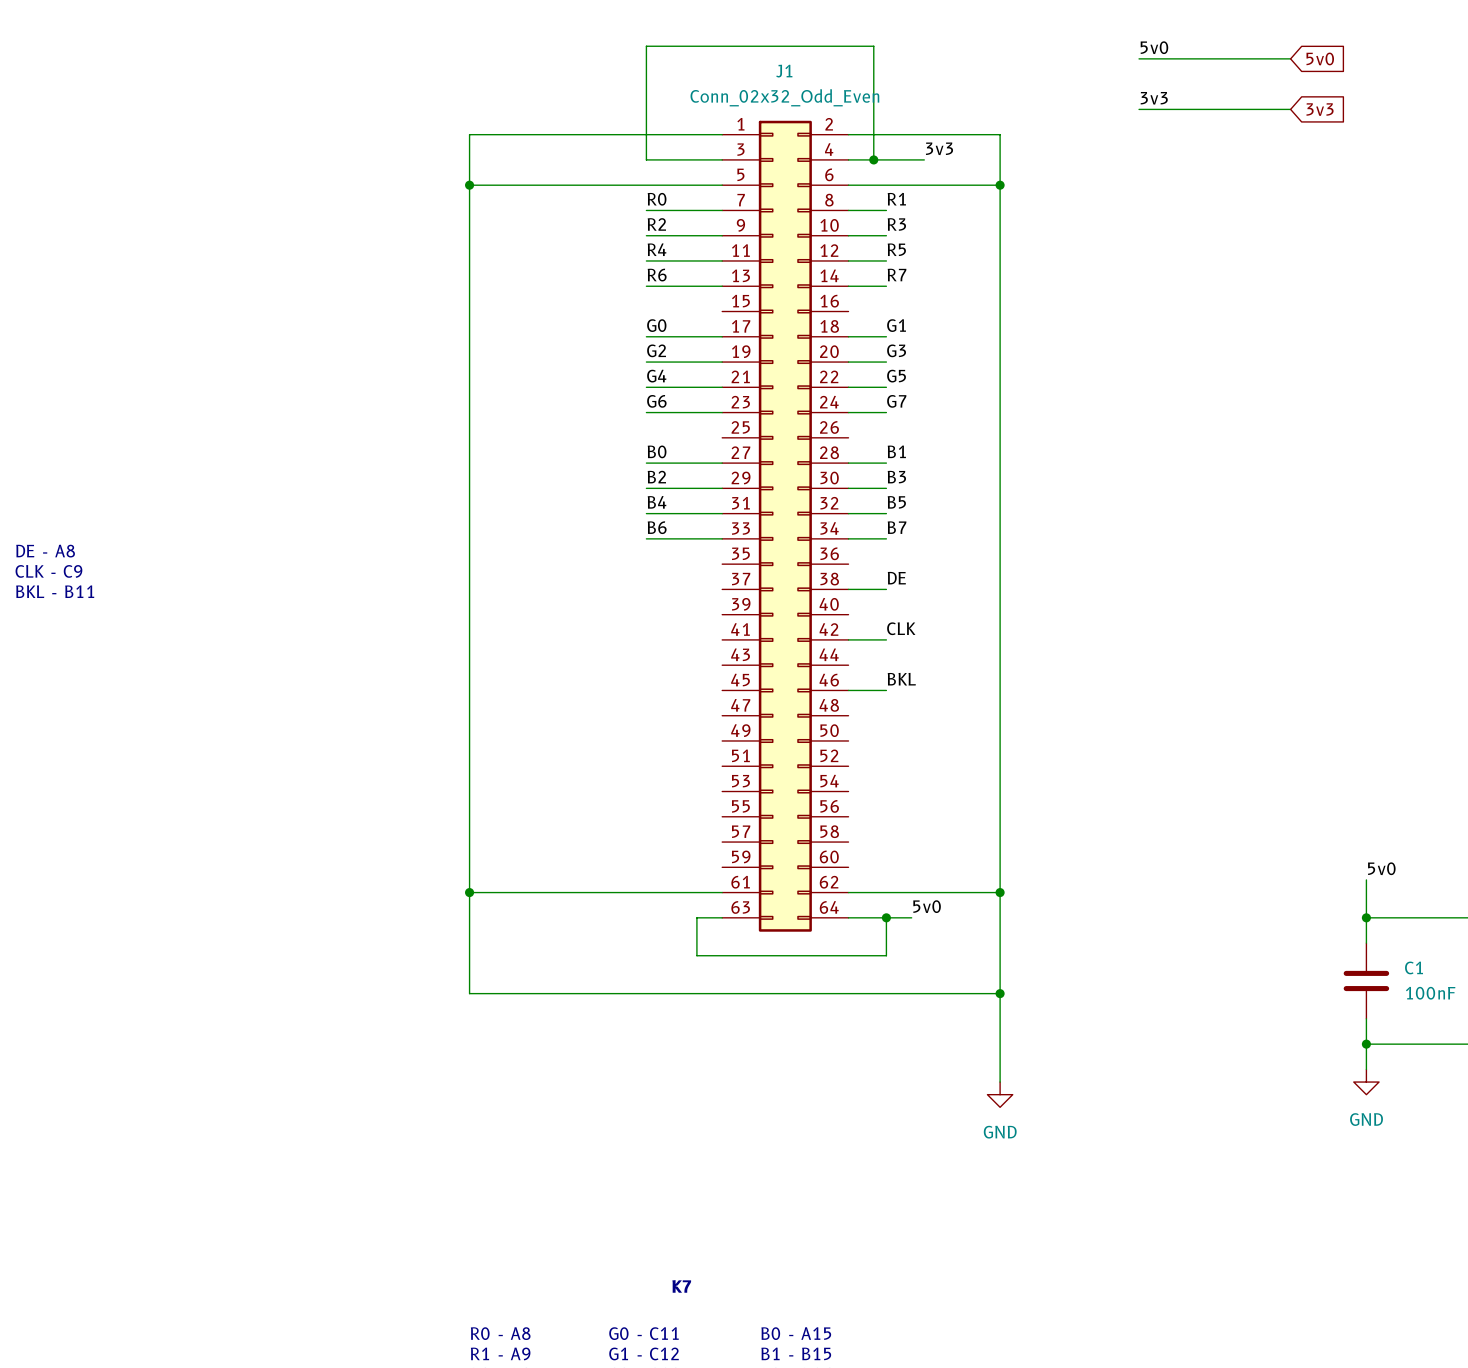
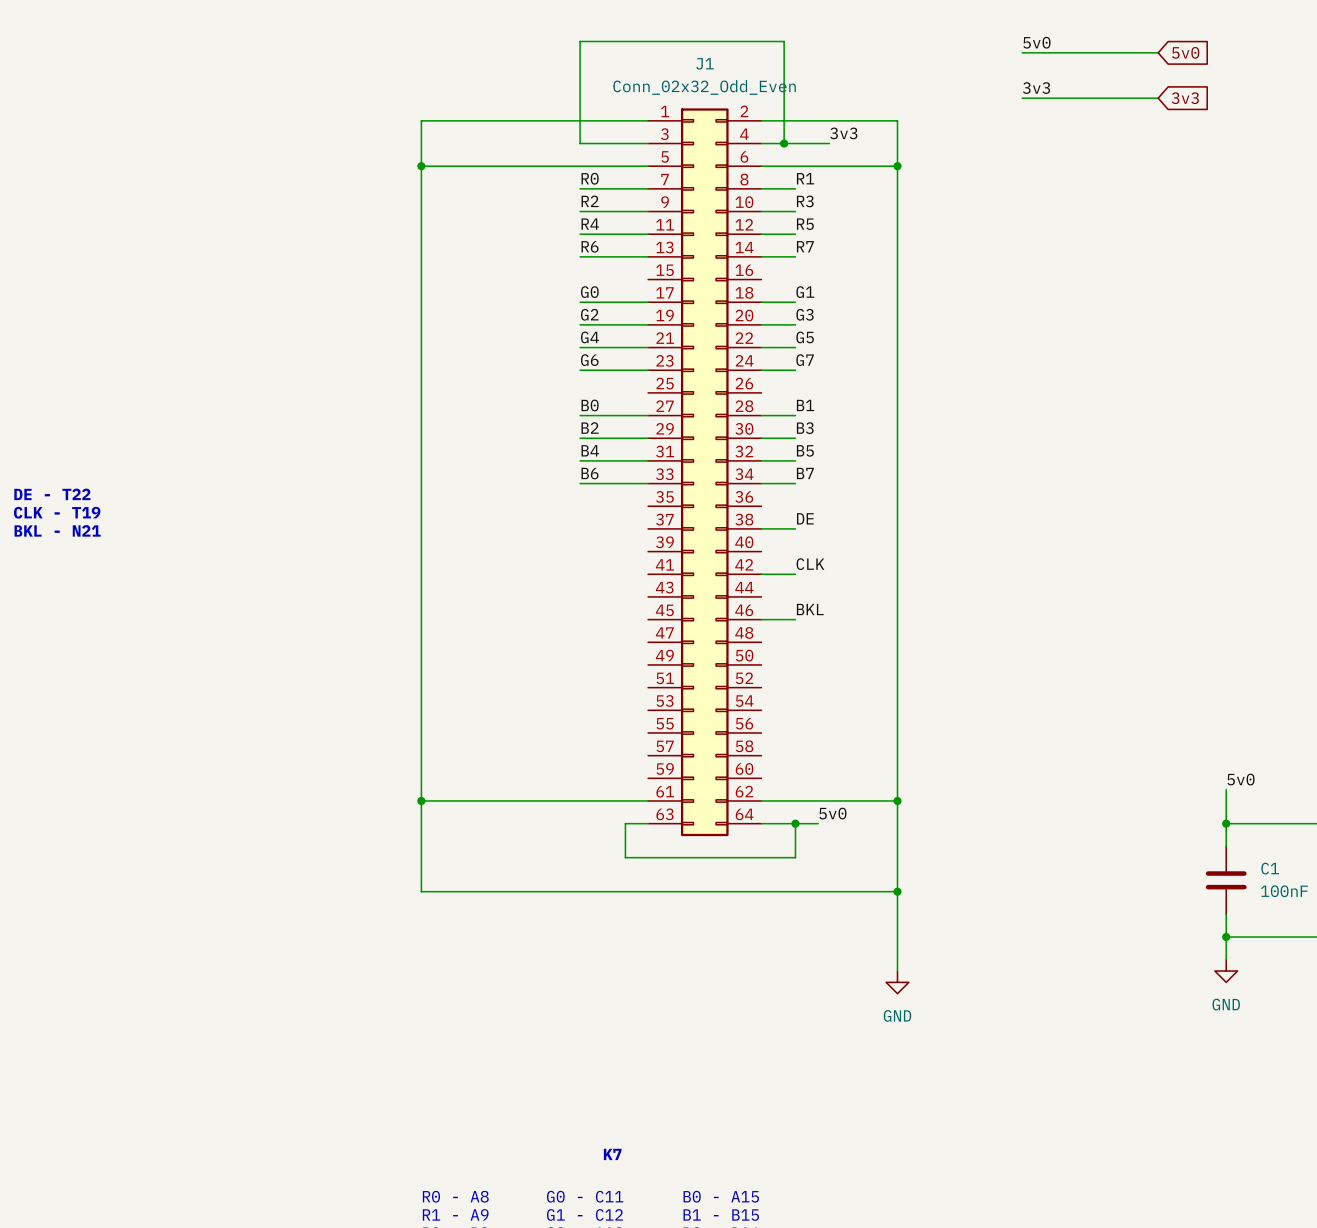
text: DE - A8 (45, 551) -> DE - T22 (52, 494)
text: CLK - C9 (48, 571) -> CLK - T19 (57, 512)
text: BKL - B11 (55, 591) -> BKL - N21 (57, 530)

